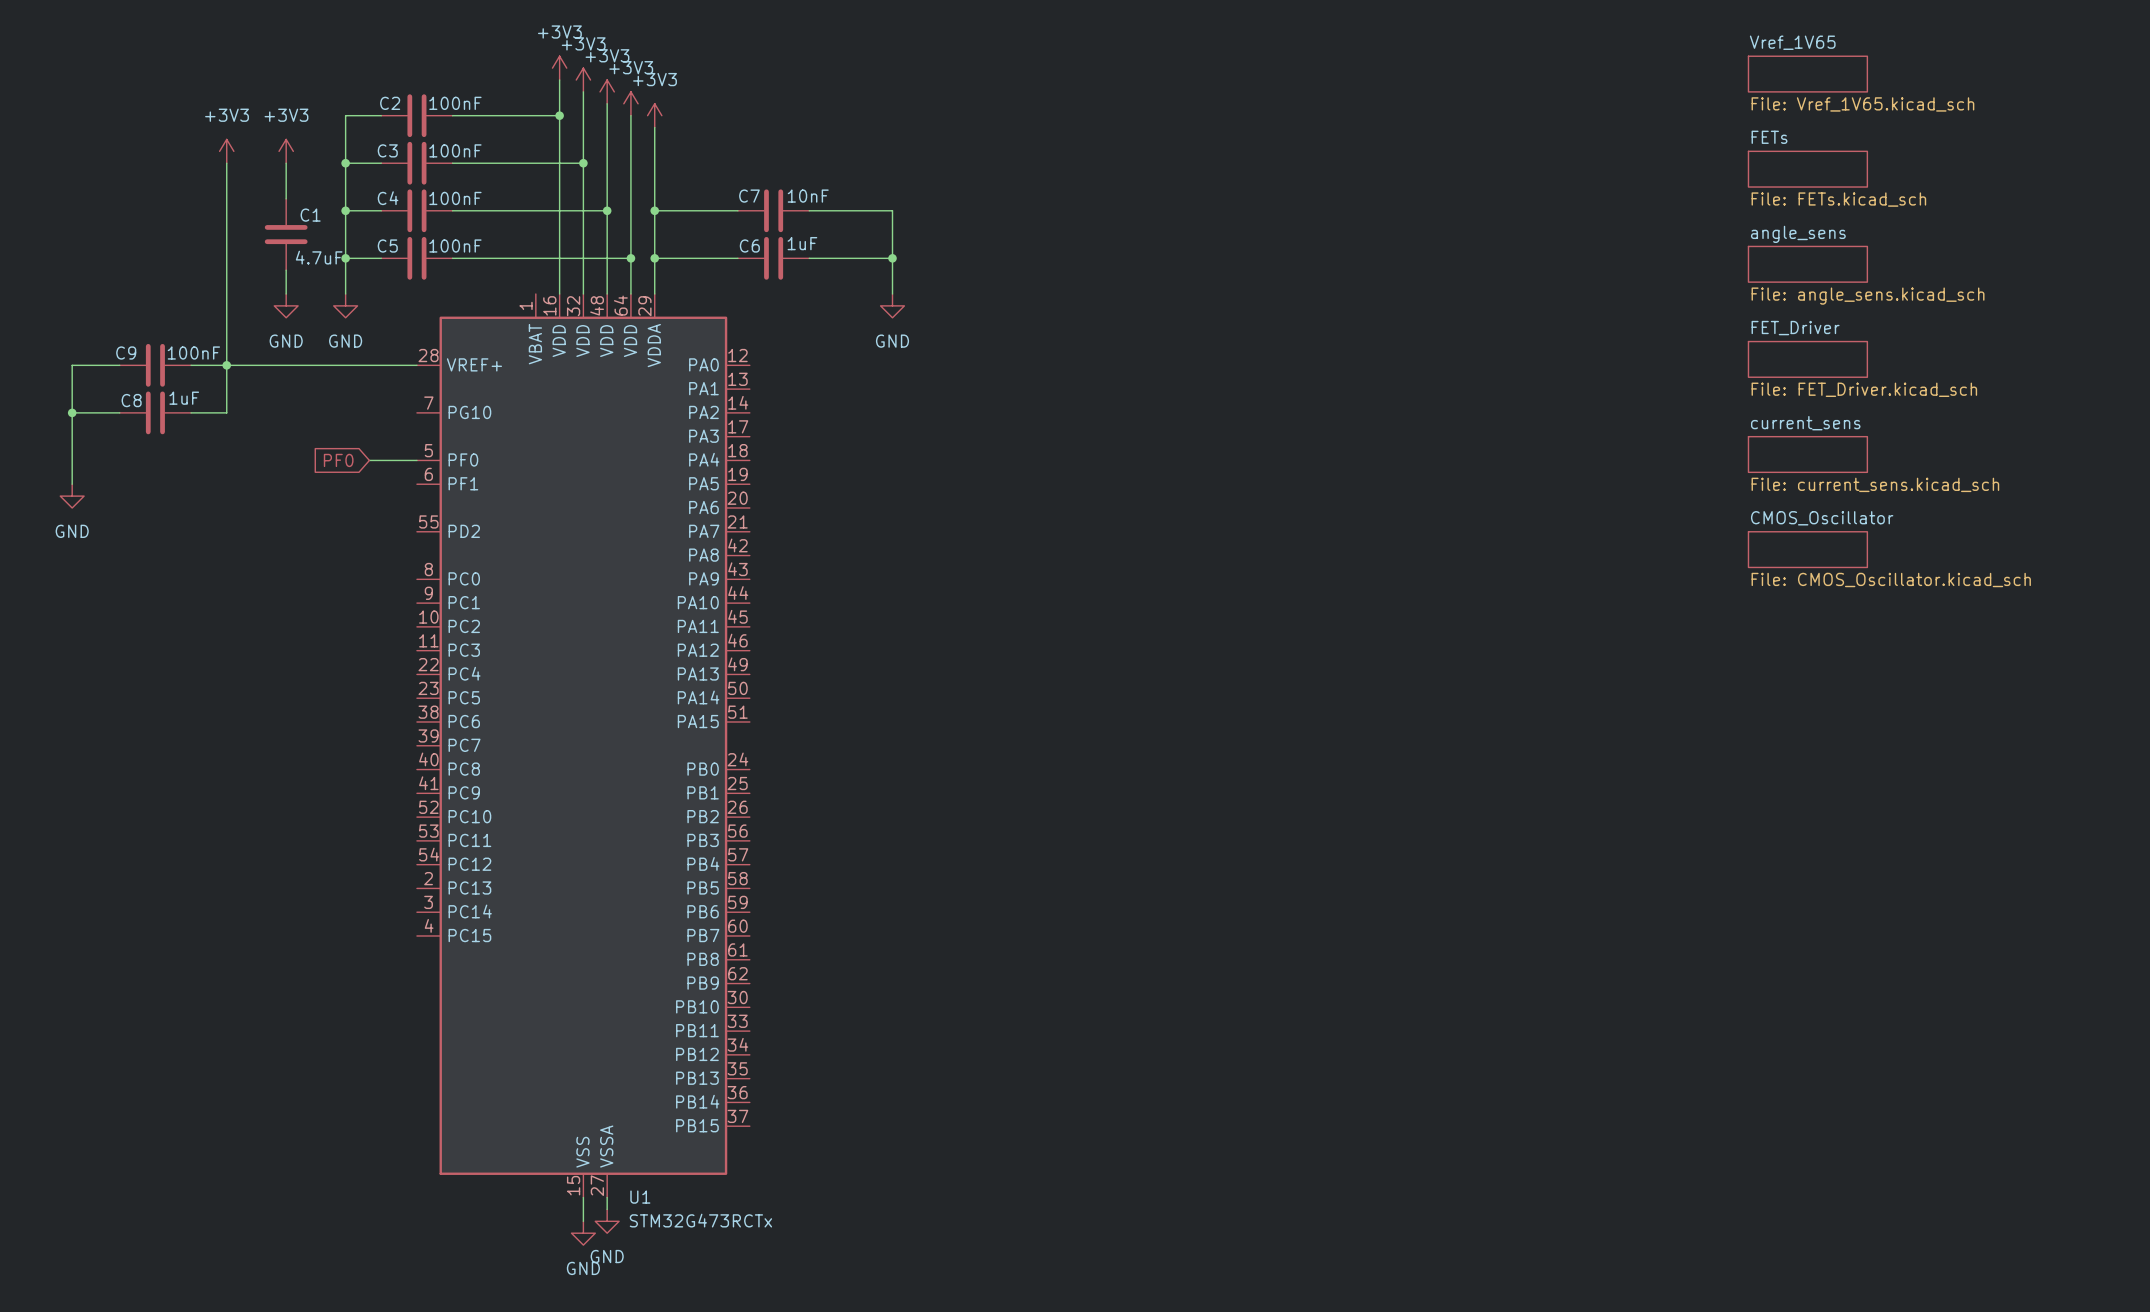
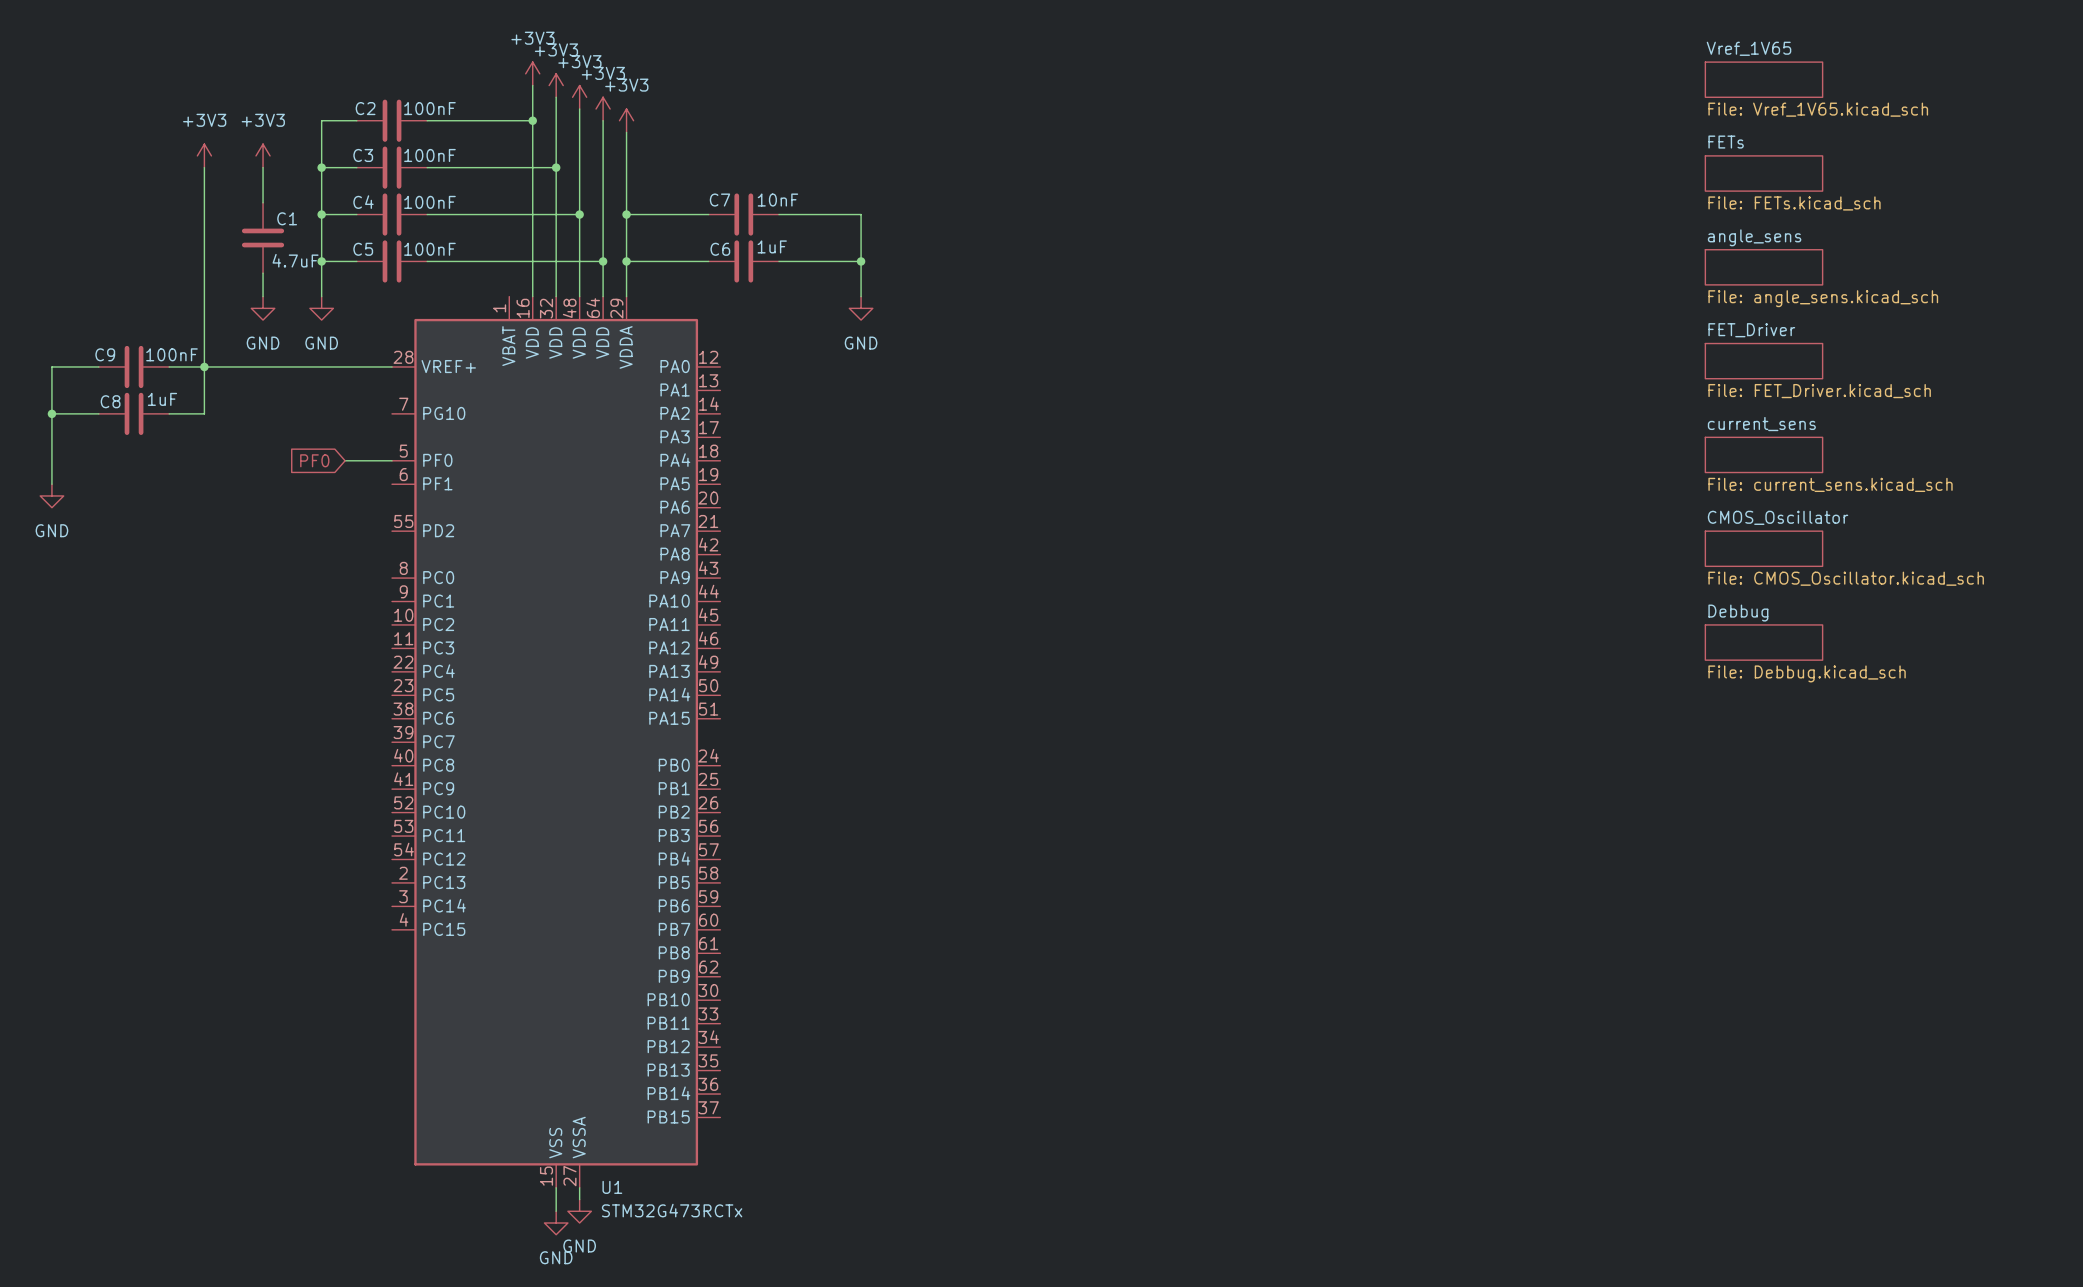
sheet Debbug: none -> File: Debbug.kicad_sch (1763, 642)

